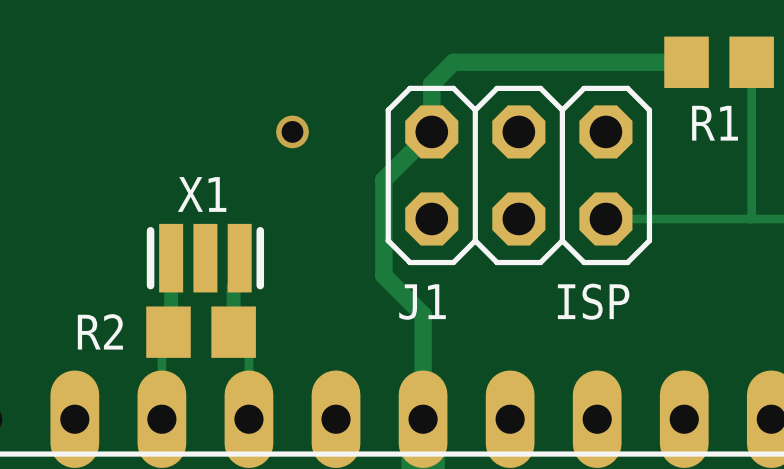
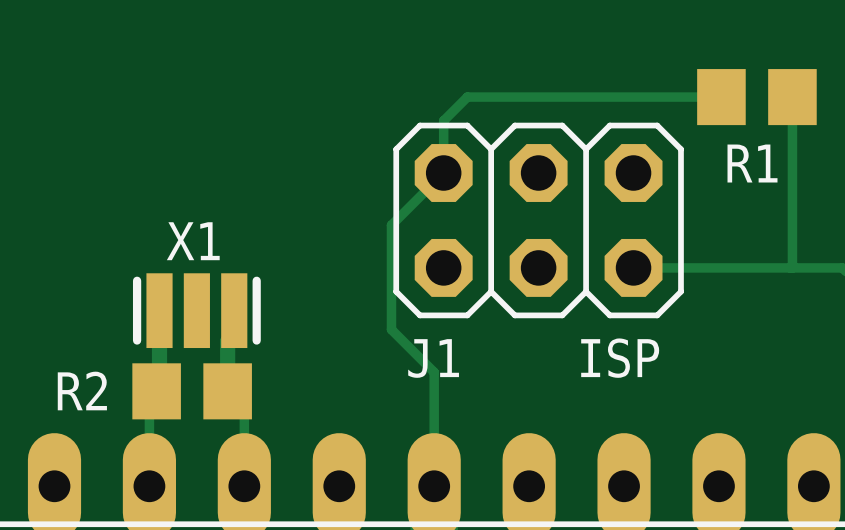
track width: thick (686, 62) (453, 62) (431, 84) (431, 131) (383, 179) (383, 275) (423, 314) (423, 419) -> thin (721, 97) (467, 97) (443, 120) (443, 173) (391, 225) (391, 329) (434, 372) (434, 486)
via: (292, 131) -> none

